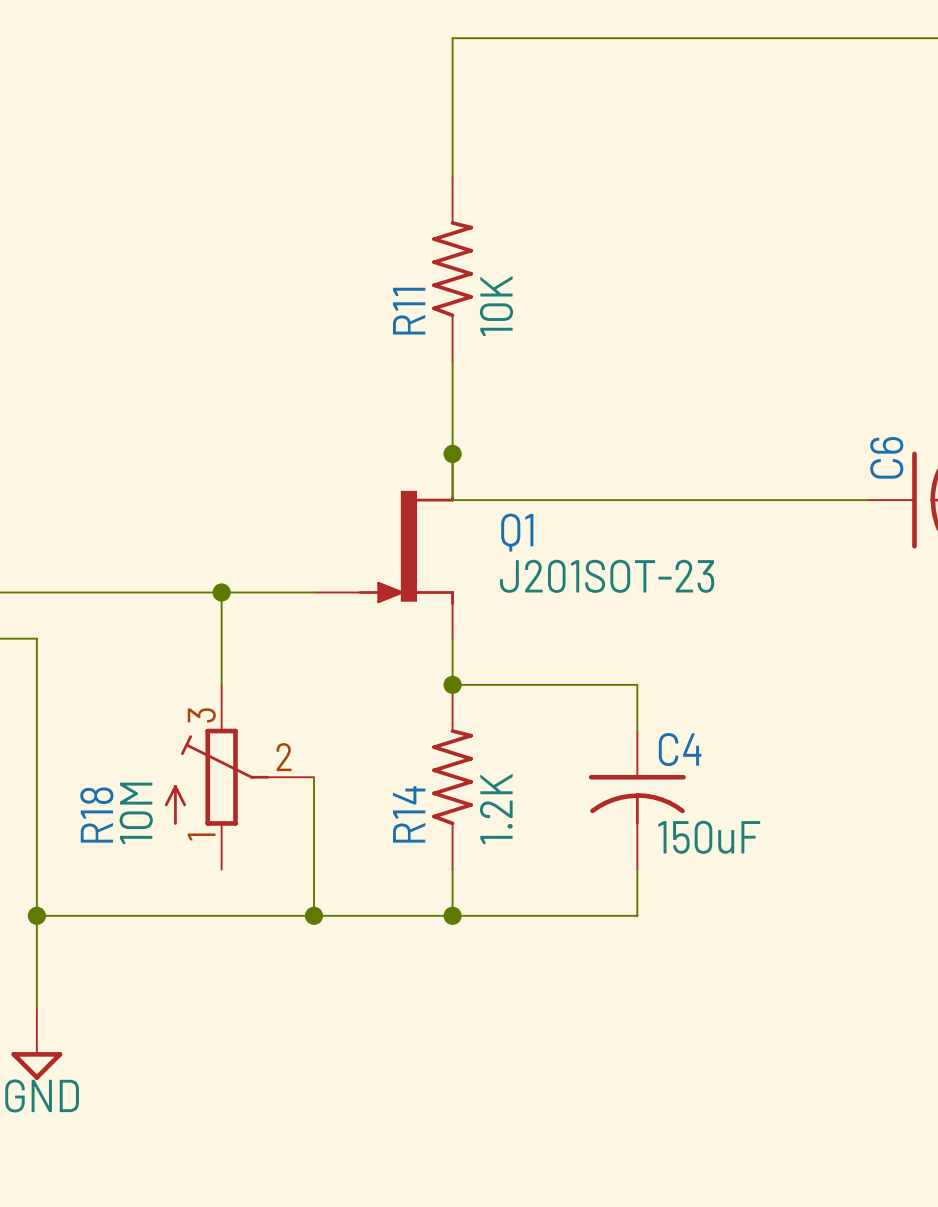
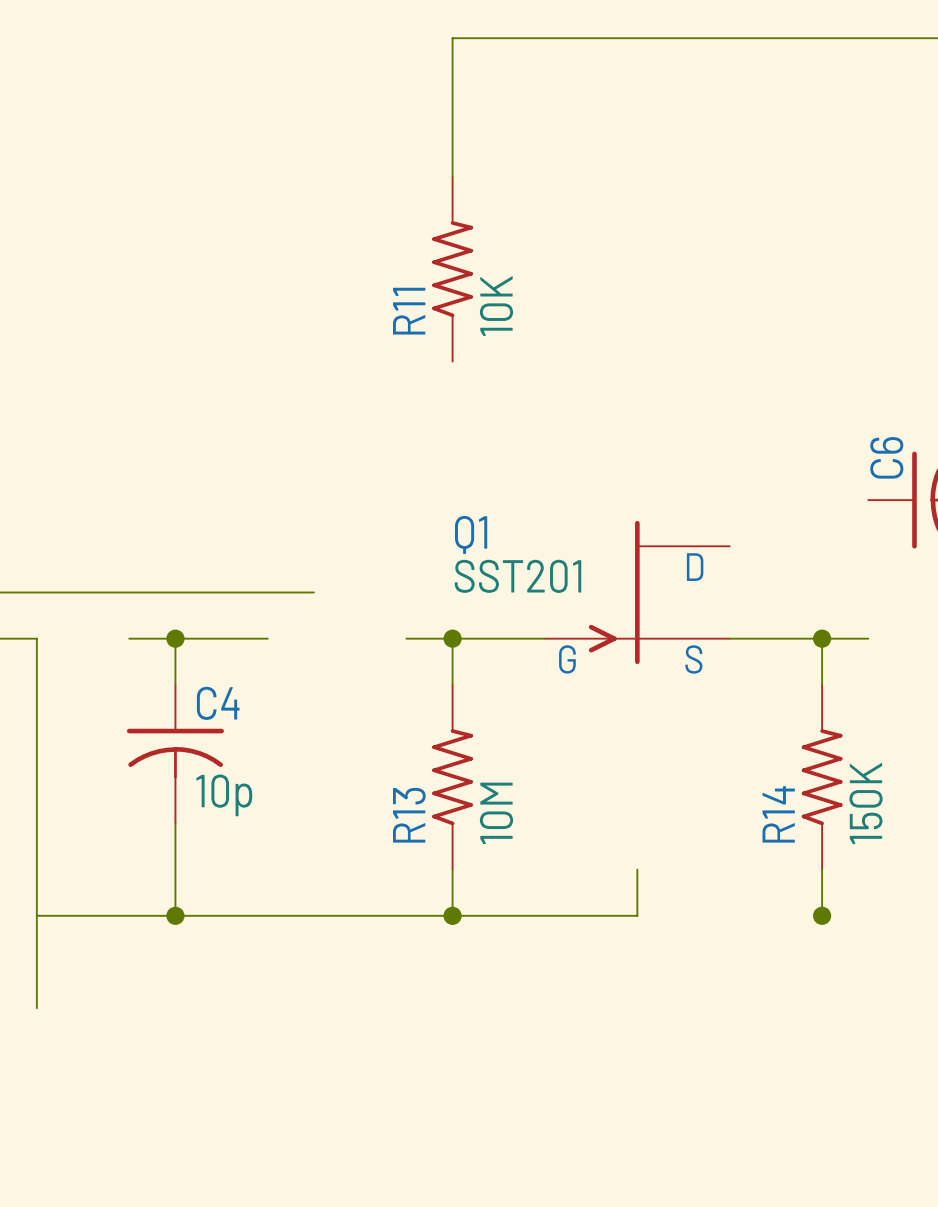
wire: (452, 361) (452, 500) (868, 500) -> none
Q1 symbol: [314, 453, 454, 639] -> [544, 520, 730, 665]
junction: (452, 453) -> none
Q1 name position: Q1 (517, 532) -> Q1 (471, 534)
Q1 value: J201SOT-23 (607, 576) -> SST201 (517, 576)
wire: (221, 592) (221, 684) -> (175, 823) (175, 915)
junction position: (221, 592) -> (175, 638)
wire: none -> (129, 638) (267, 638)
wire: none -> (175, 638) (175, 684)
wire: none -> (406, 638) (544, 638)
wire: none -> (729, 638) (868, 638)
wire: none -> (822, 638) (822, 684)
junction: none -> (822, 638)
wire: (452, 684) (637, 684) (637, 731) -> none
junction position: (452, 684) -> (452, 638)
R18: 10M (239, 777) -> none
wire: (314, 777) (314, 915) -> none
R14: none -> 150K (822, 777)
C4 position: (637, 800) -> (175, 754)
R14 value: 1.2K (496, 808) -> 10M (496, 813)
R14 name: R14 (409, 814) -> R13 (409, 815)
C4 value: 150uF (709, 837) -> 10p (224, 795)
wire: none -> (822, 869) (822, 915)
junction: (36, 915) -> none
junction: none -> (175, 915)
junction: (314, 915) -> none
junction: none -> (822, 915)
power symbol: GND (36, 1043) -> none

